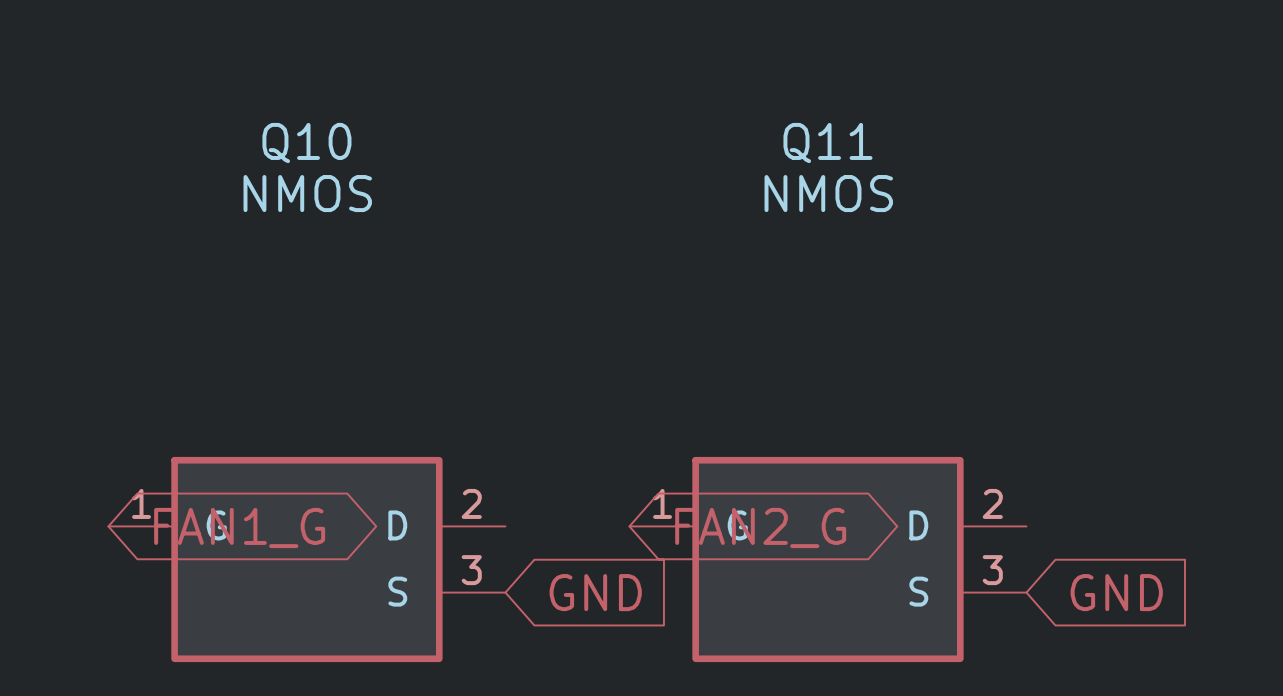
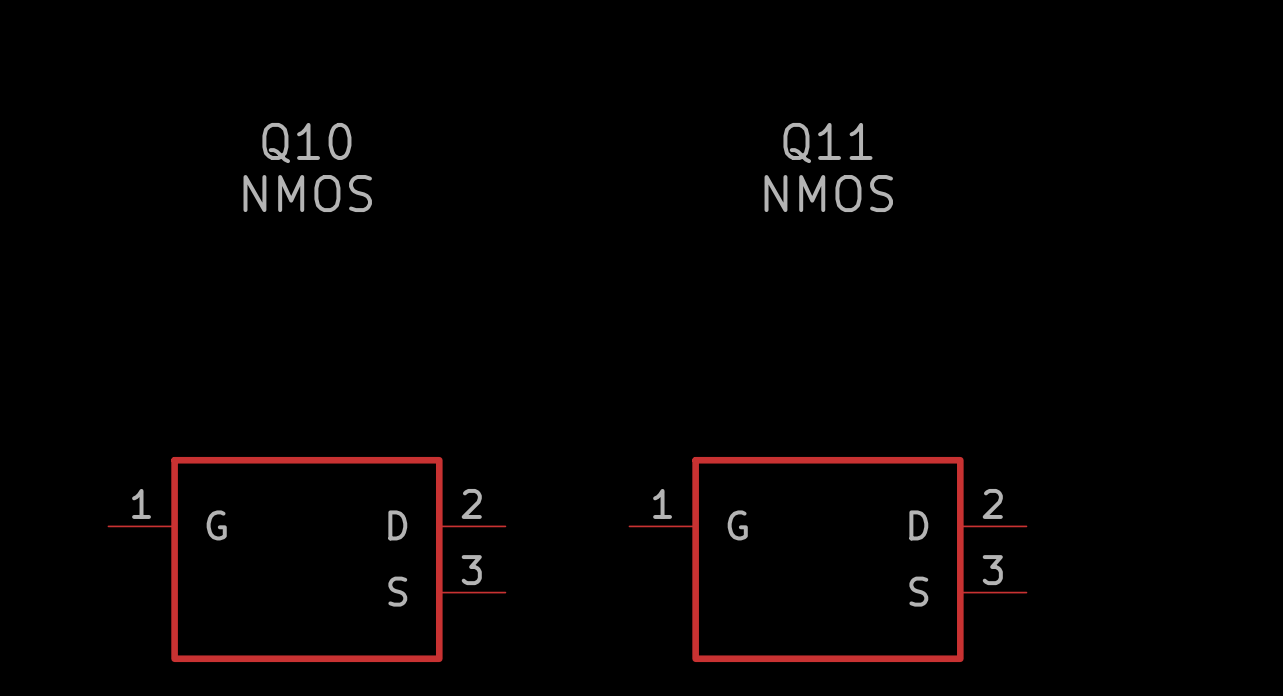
global label: FAN1_G (239, 527) -> none
global label: FAN2_G (760, 527) -> none
global label: GND (595, 592) -> none
global label: GND (1116, 592) -> none

